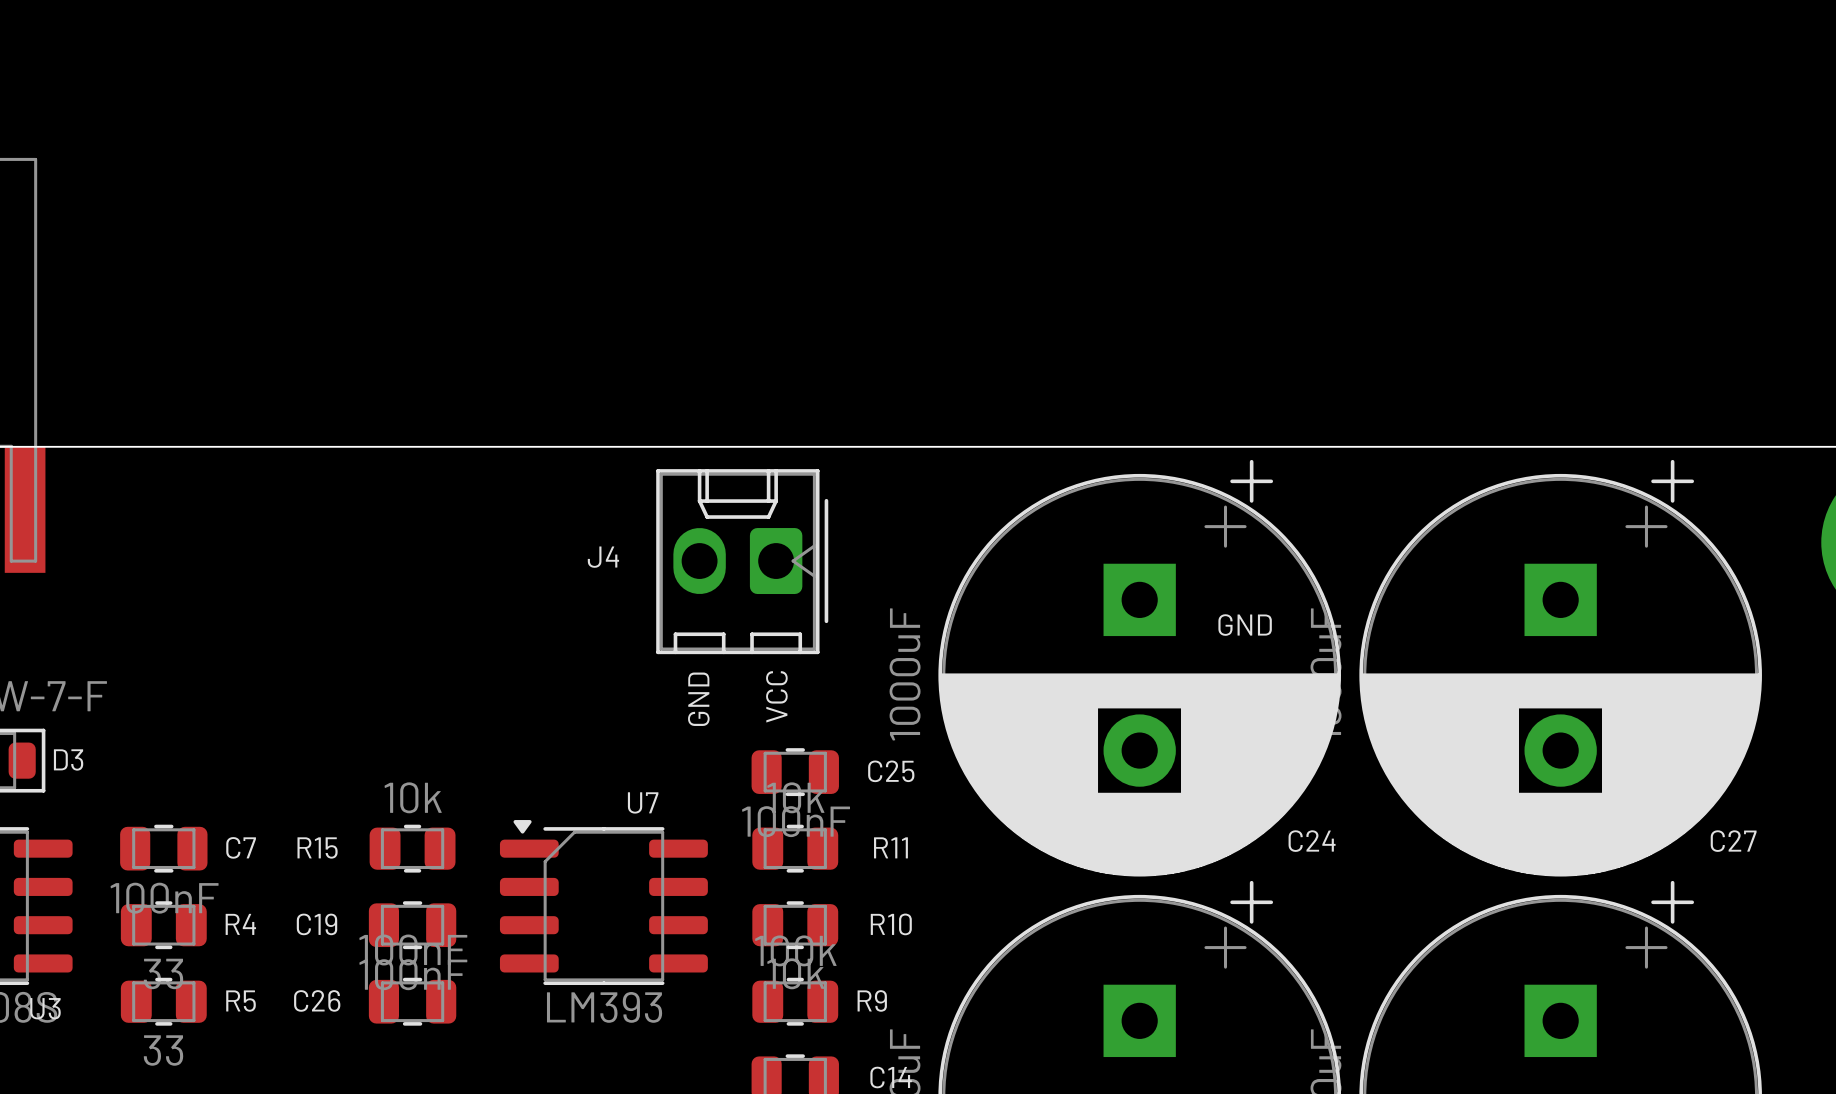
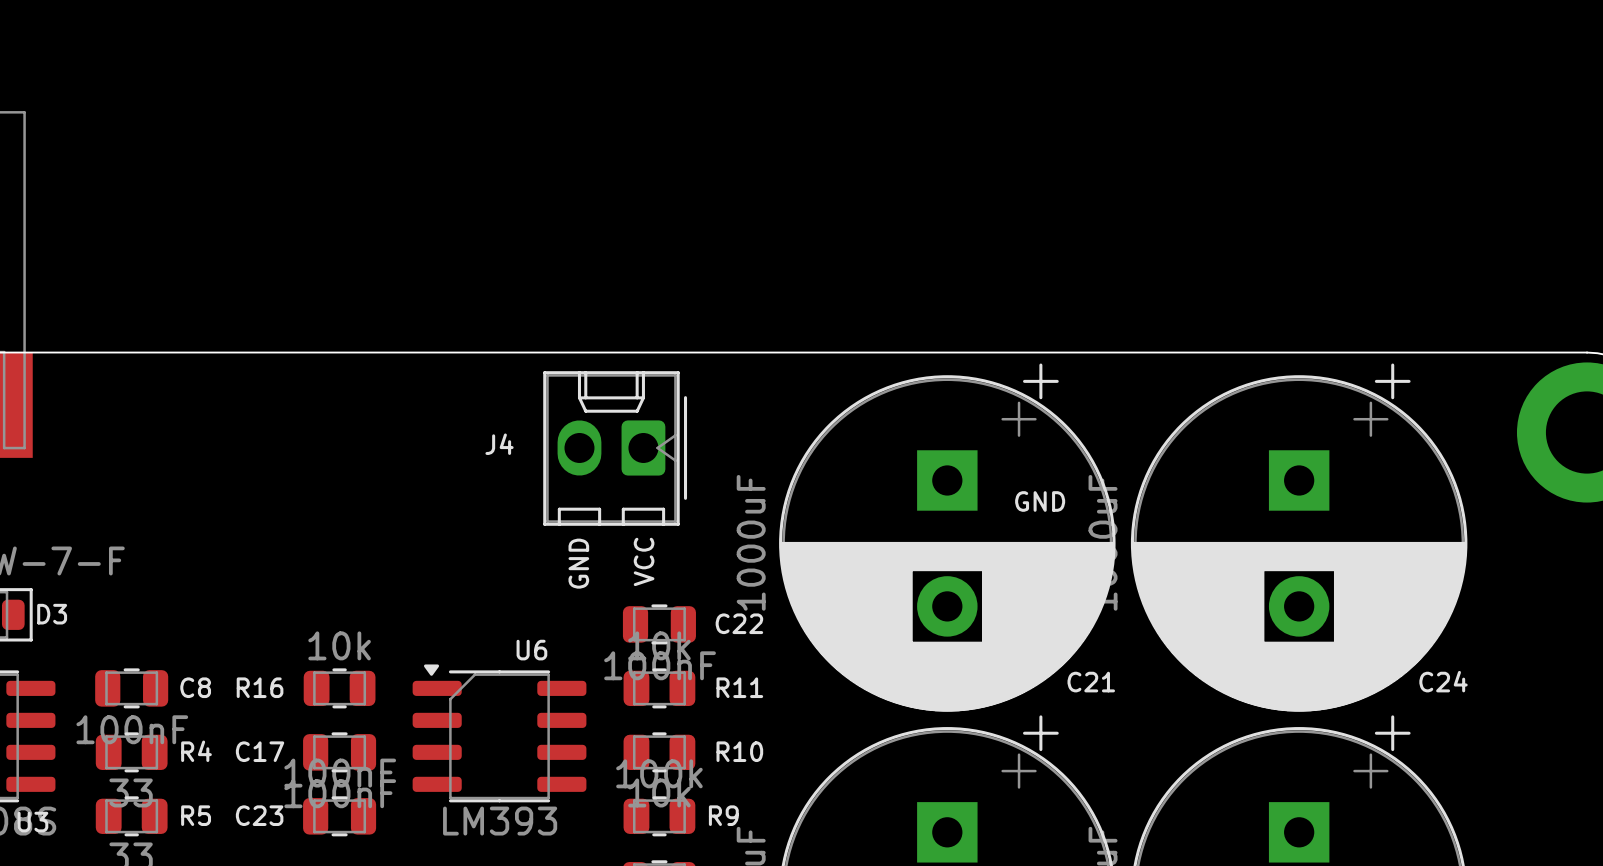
C25 name: C25 (891, 771) -> C22 (739, 623)
U7 name: U7 (643, 802) -> U6 (531, 650)
C24 name: C24 (1312, 841) -> C21 (1091, 682)
C27 name: C27 (1733, 841) -> C24 (1443, 681)
C7 name: C7 (241, 847) -> C8 (195, 687)
R15 name: R15 (317, 847) -> R16 (260, 687)
C19 name: C19 (316, 924) -> C17 (260, 751)
C26 name: C26 (317, 1000) -> C23 (259, 815)

